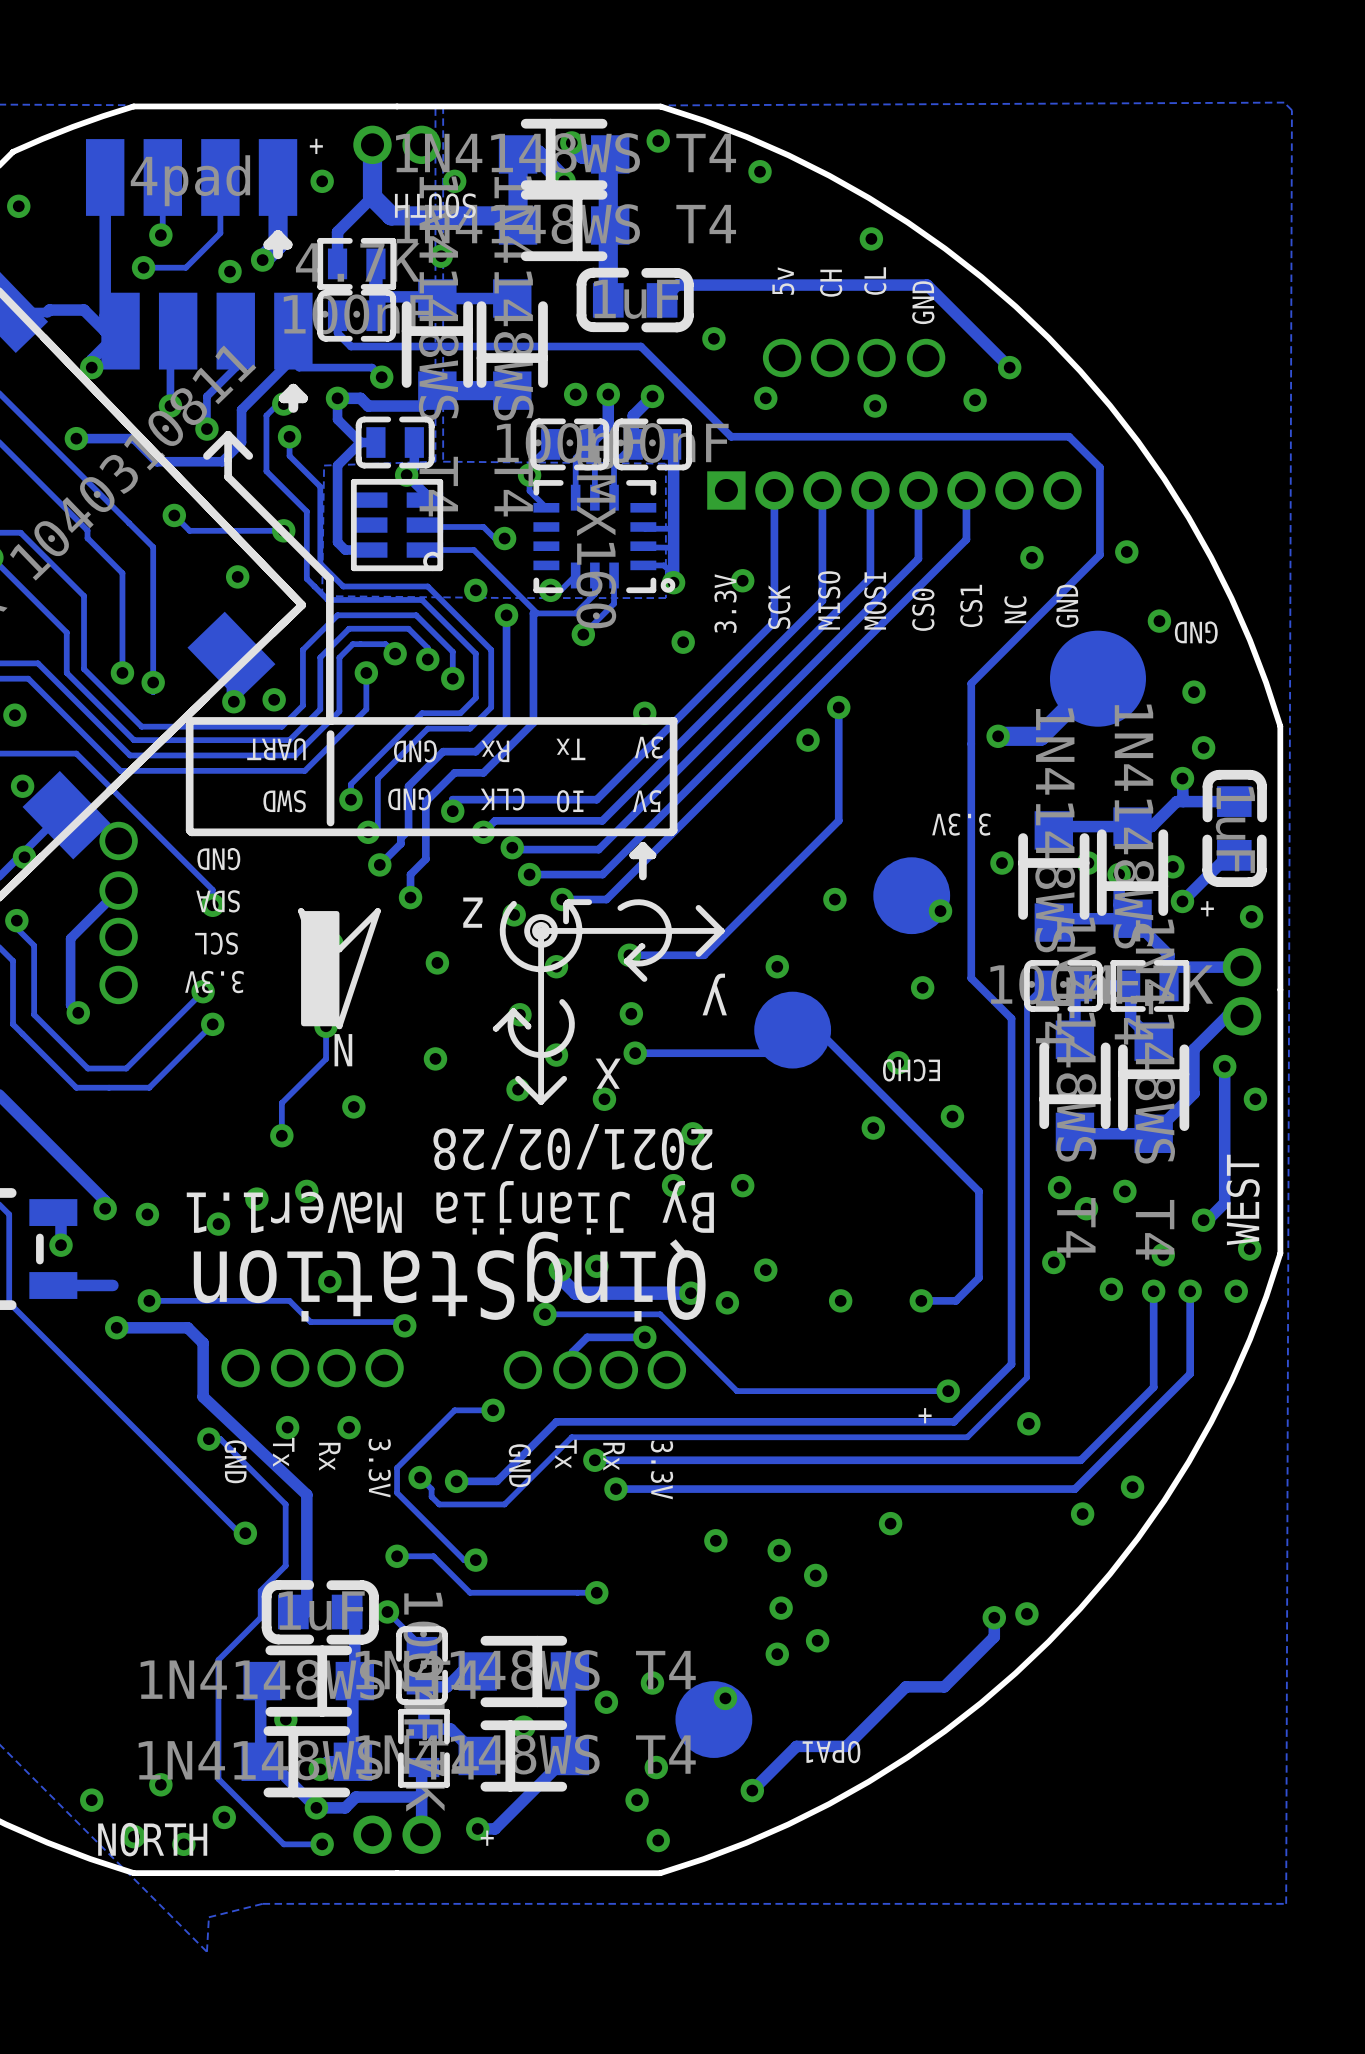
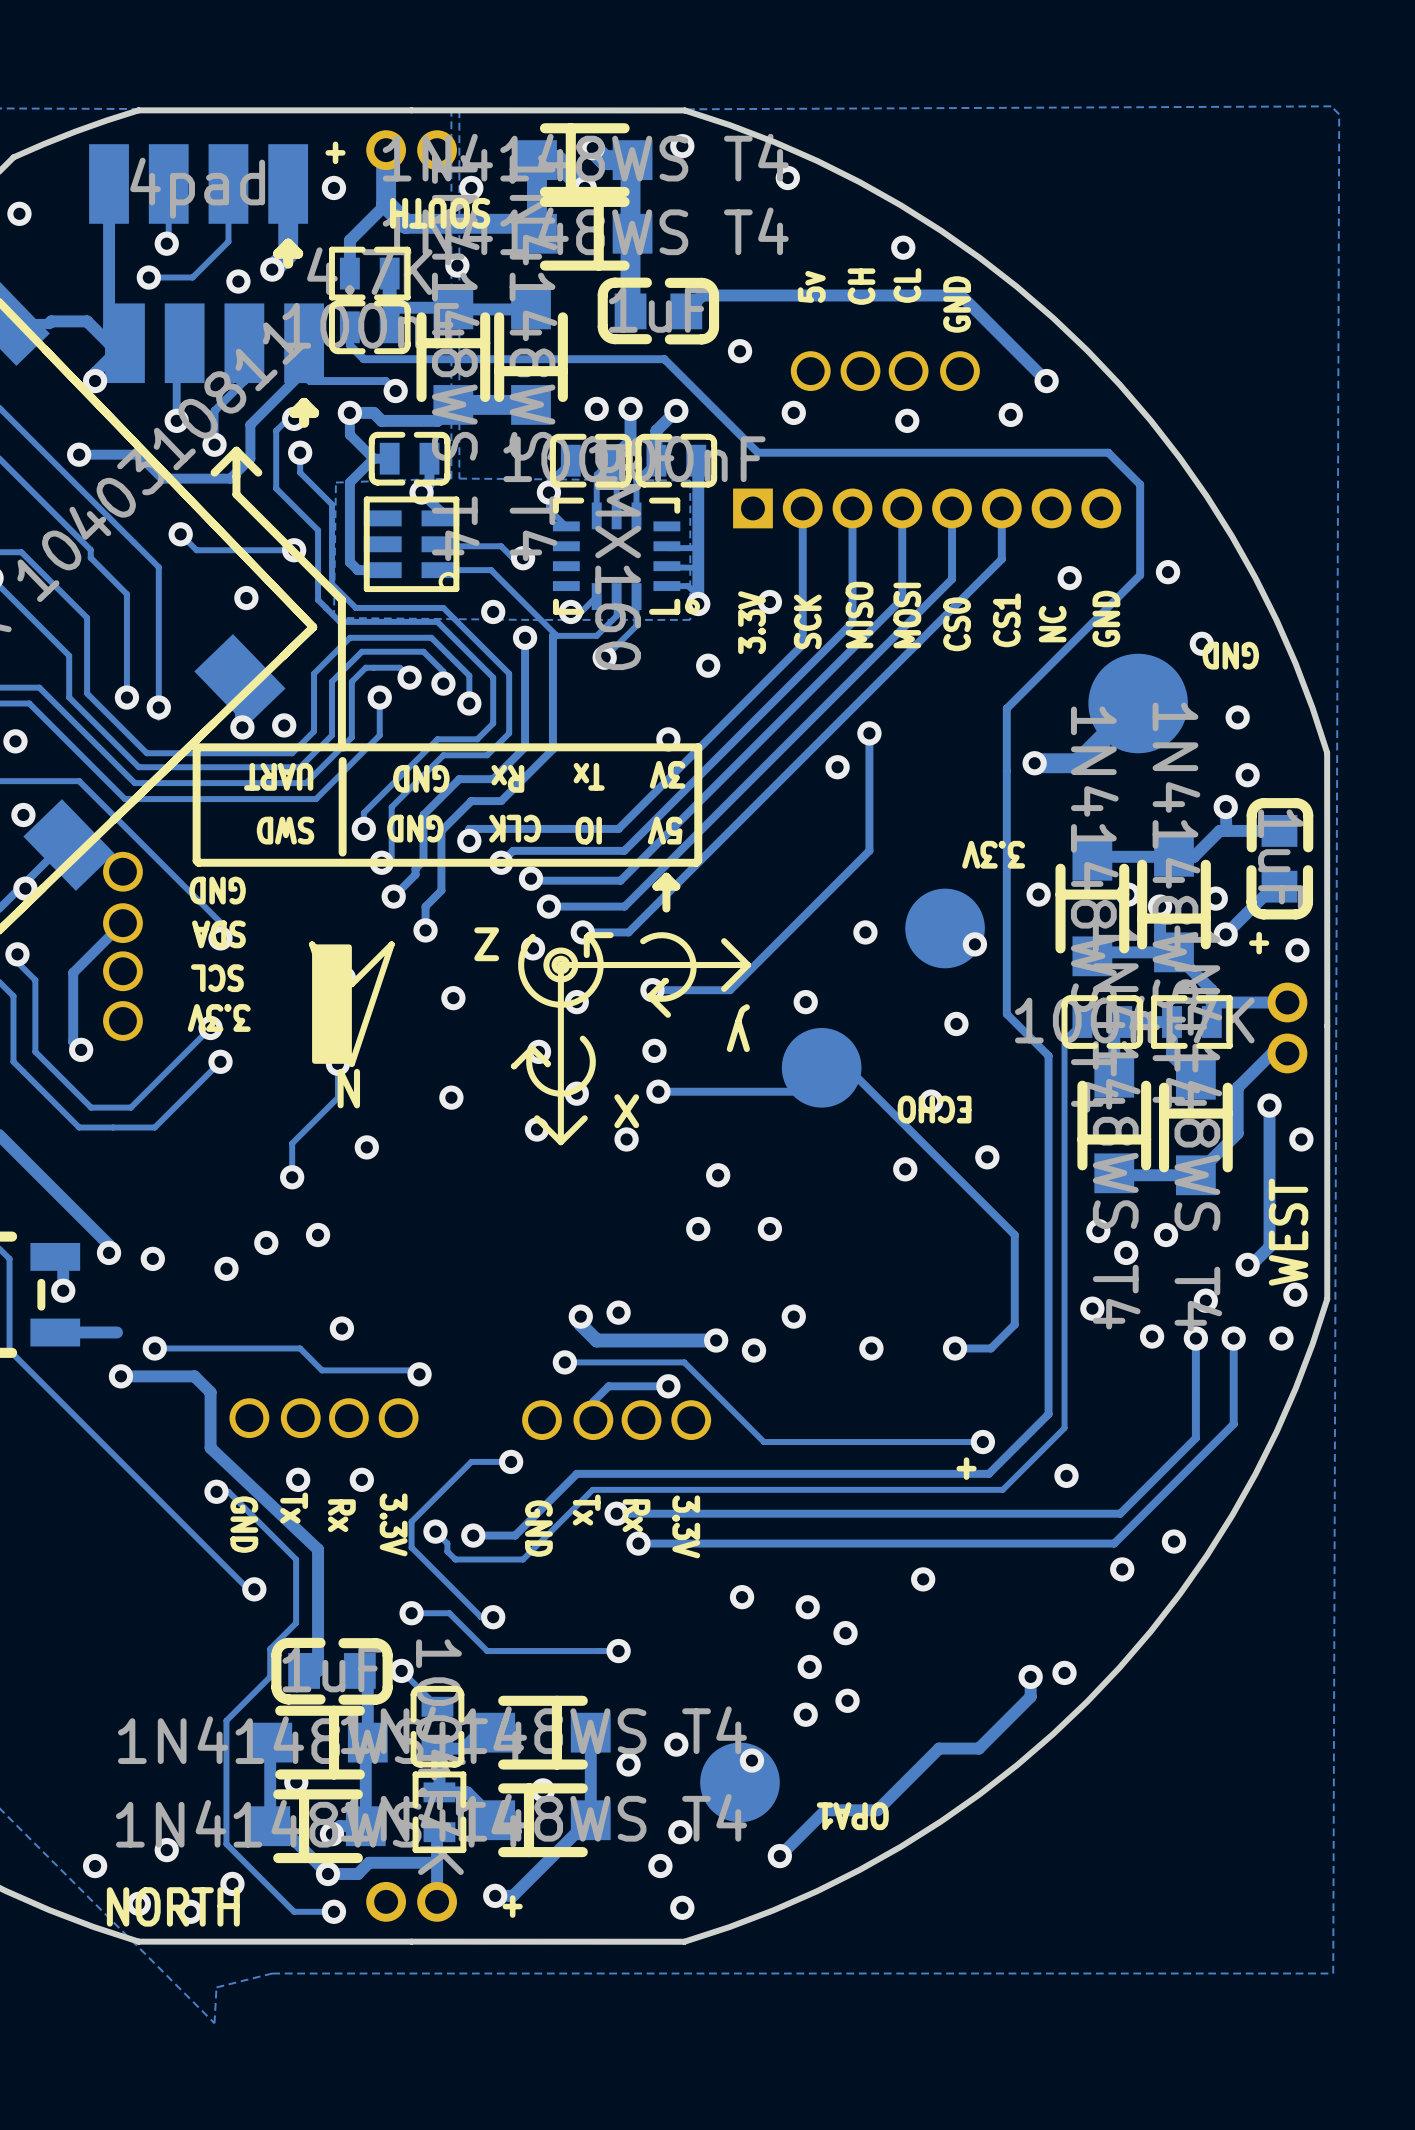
text: 2021/02/28 (572, 1147) -> none
text: By Jianjia Ma (532, 1207) -> none
text: Ver1.1 (270, 1212) -> none
text: QingStation (449, 1276) -> none

